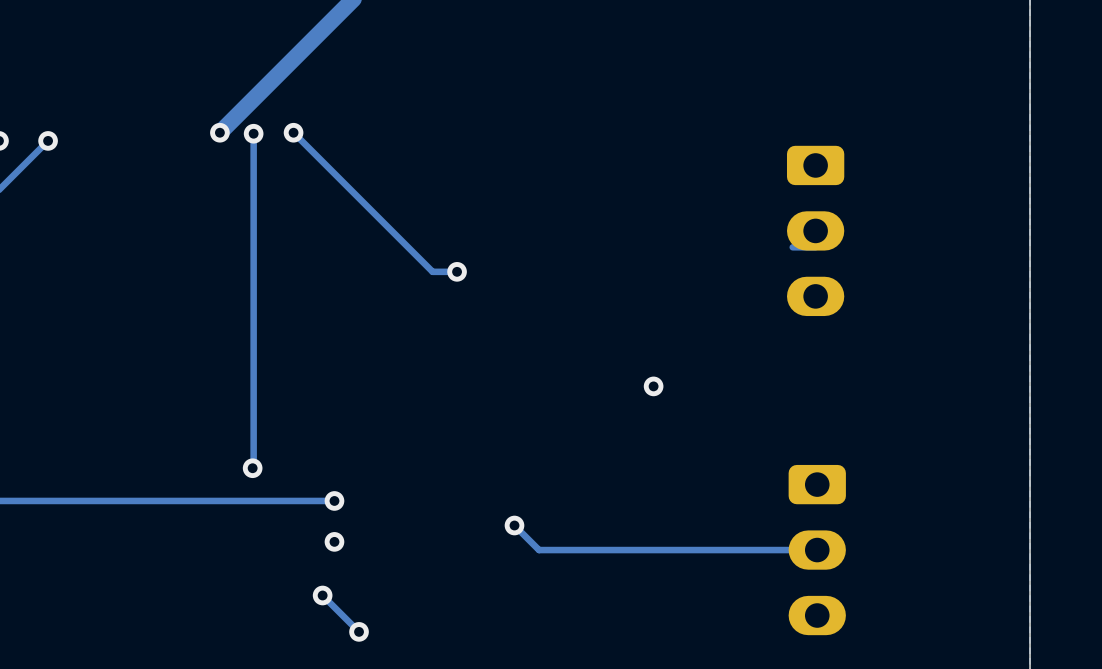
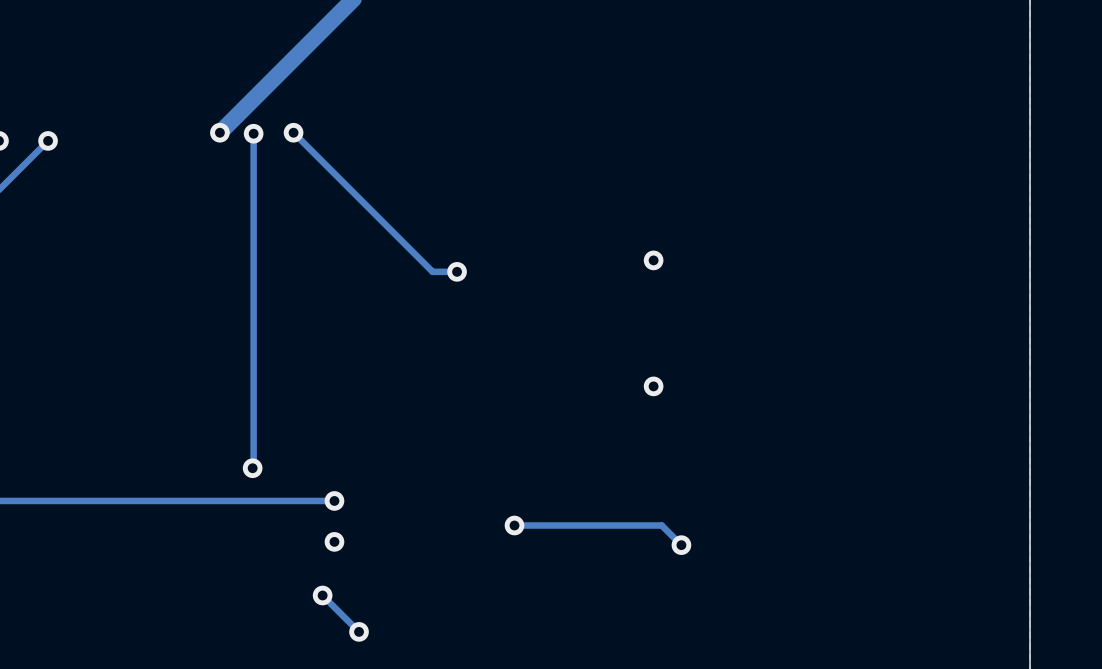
part: (815, 230) -> none
track: (815, 247) (792, 247) -> none
via: none -> (653, 260)
track: (514, 525) (539, 550) (817, 550) -> (514, 525) (661, 525) (681, 545)
via: none -> (681, 545)
part: (817, 550) -> none

